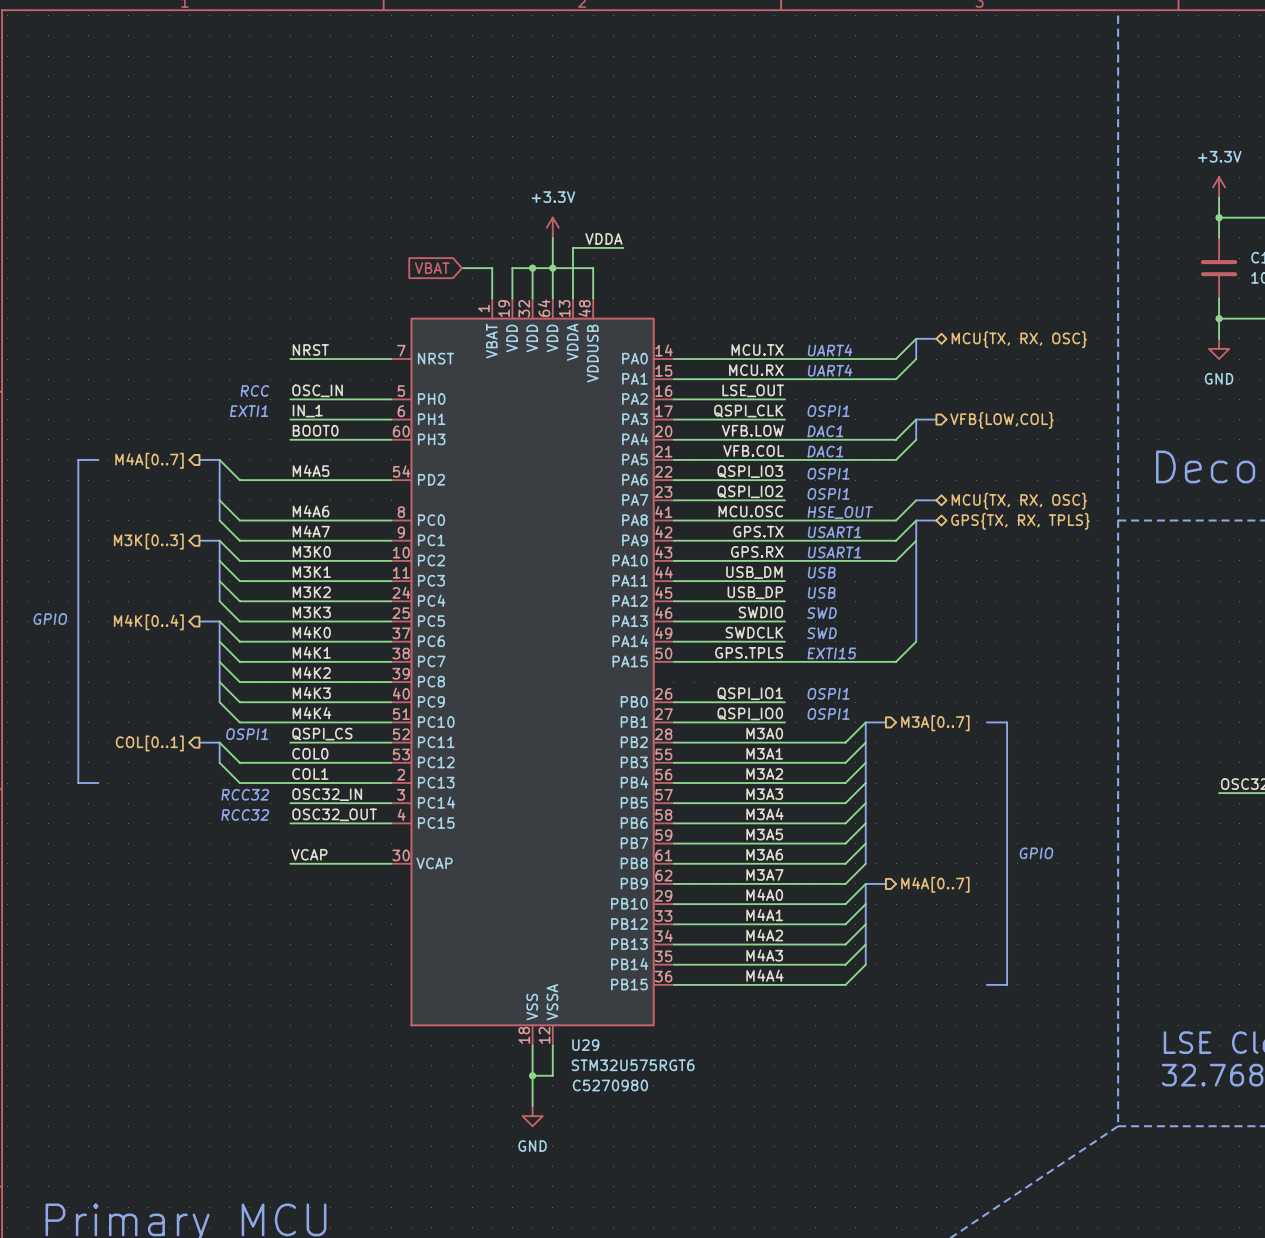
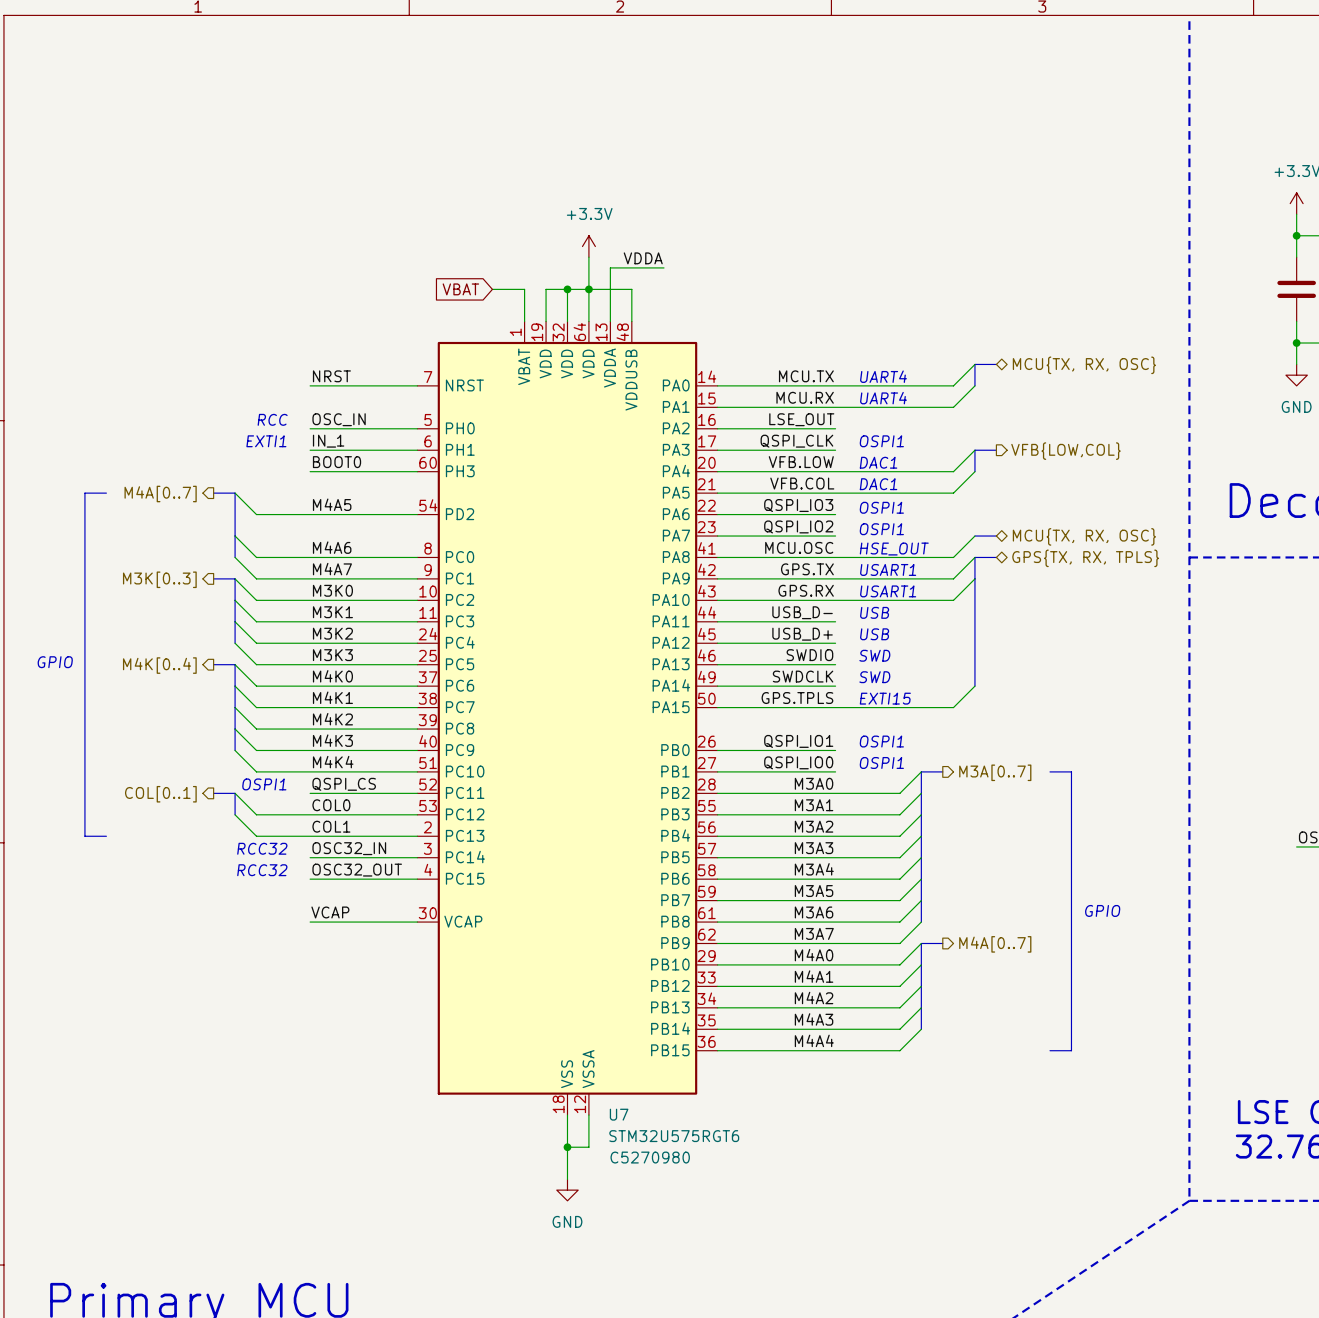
label: USB_DM (754, 572) -> USB_D- (802, 612)
label: USB_DP (755, 592) -> USB_D+ (802, 634)
U29 name: U29 (585, 1045) -> U7 (619, 1114)

